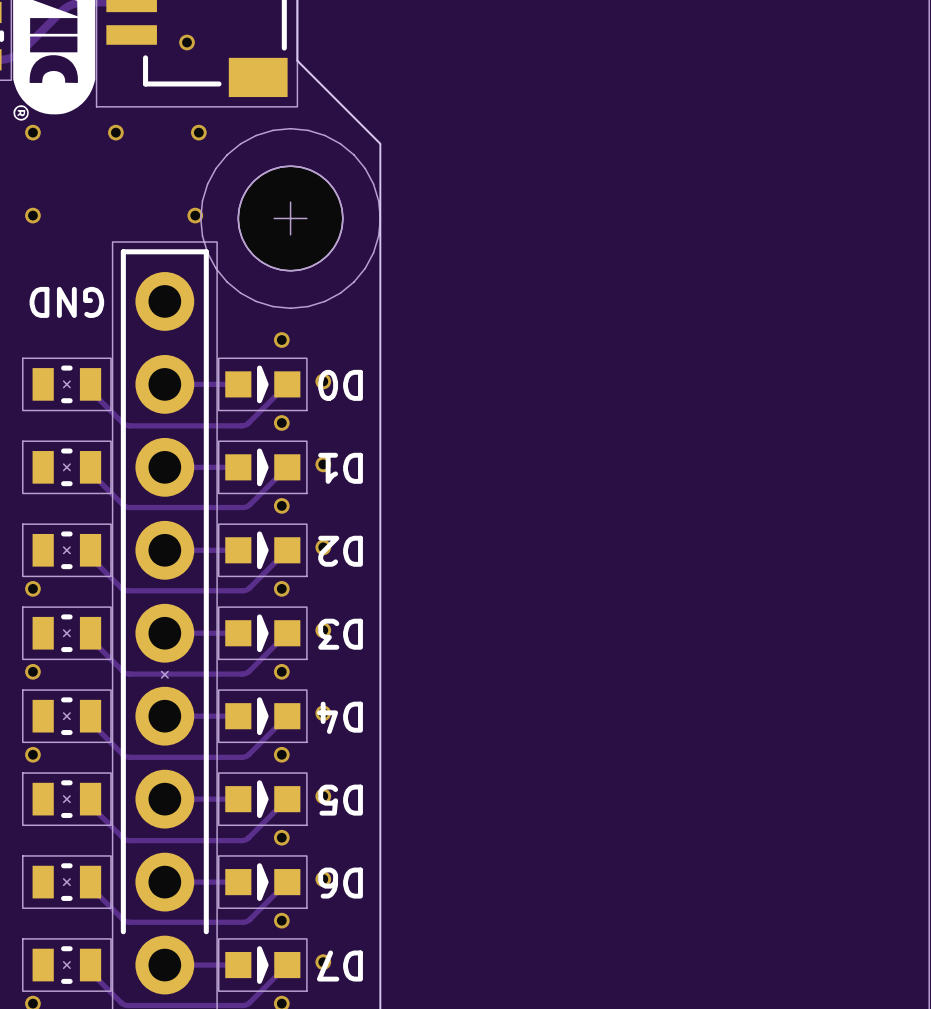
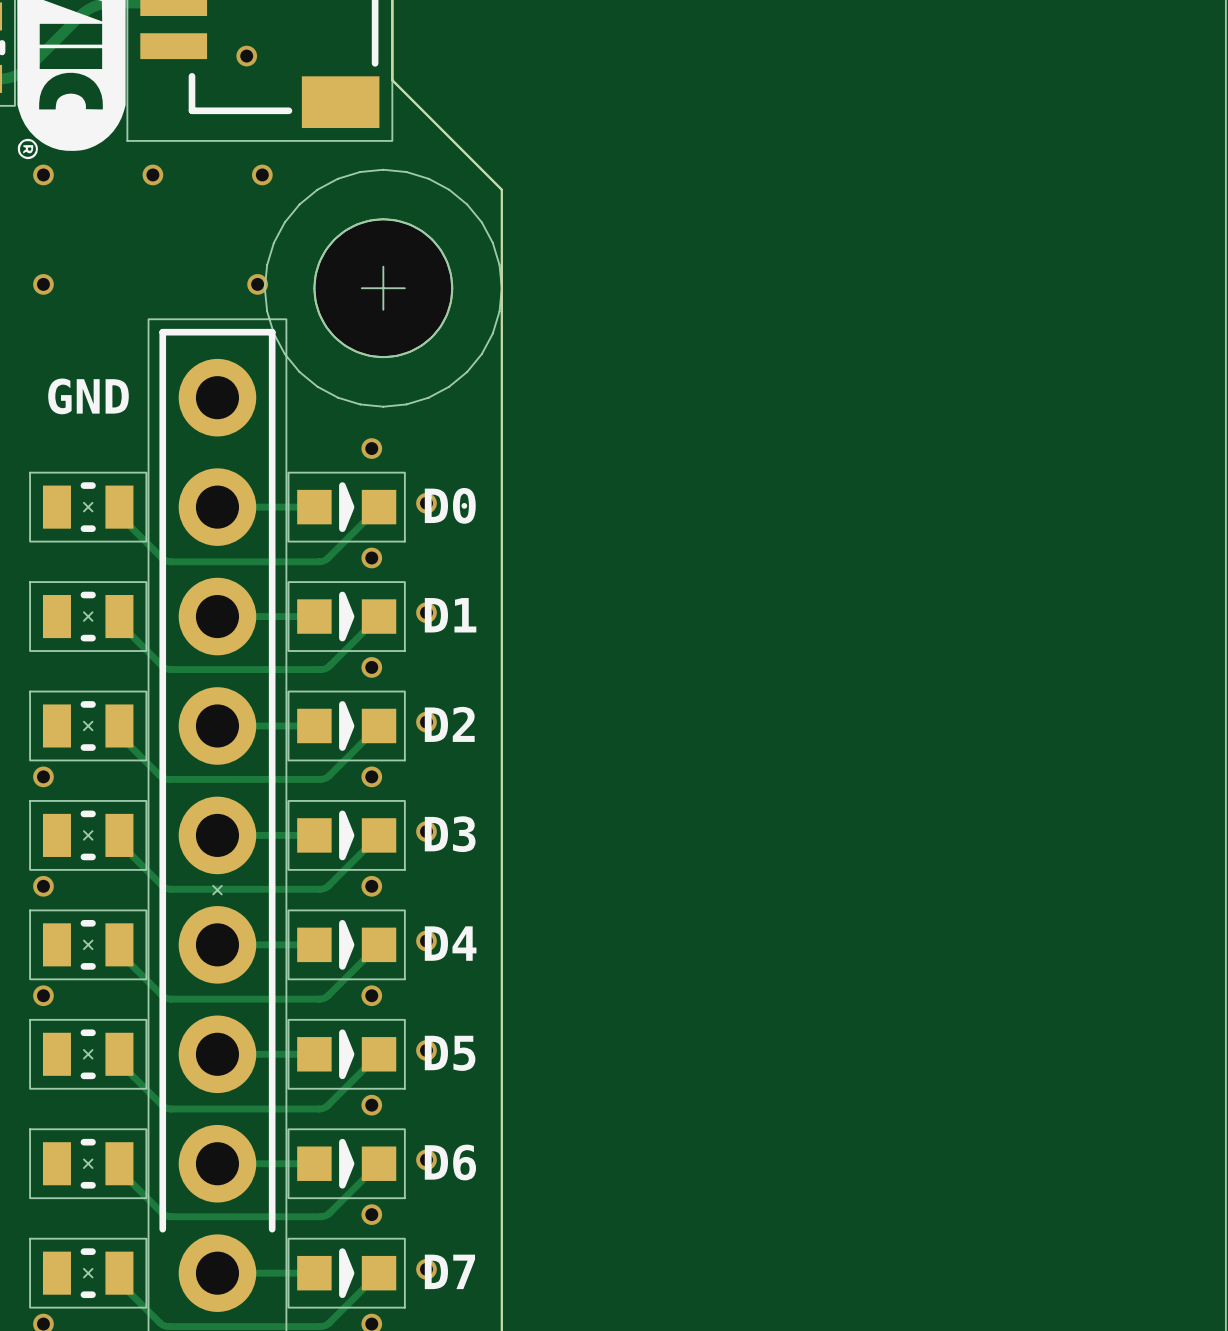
text rotation: 0° (66, 302) -> 180° (88, 396)
part value rotation: 0° (340, 385) -> 180° (450, 505)
part value rotation: 0° (340, 468) -> 180° (450, 615)
part value rotation: 0° (340, 551) -> 180° (449, 724)
part value rotation: 0° (340, 634) -> 180° (450, 834)
part value rotation: 0° (339, 717) -> 180° (450, 943)
part value rotation: 0° (340, 800) -> 180° (450, 1053)
part value rotation: 0° (340, 883) -> 180° (450, 1162)
part value rotation: 0° (339, 966) -> 180° (449, 1271)

